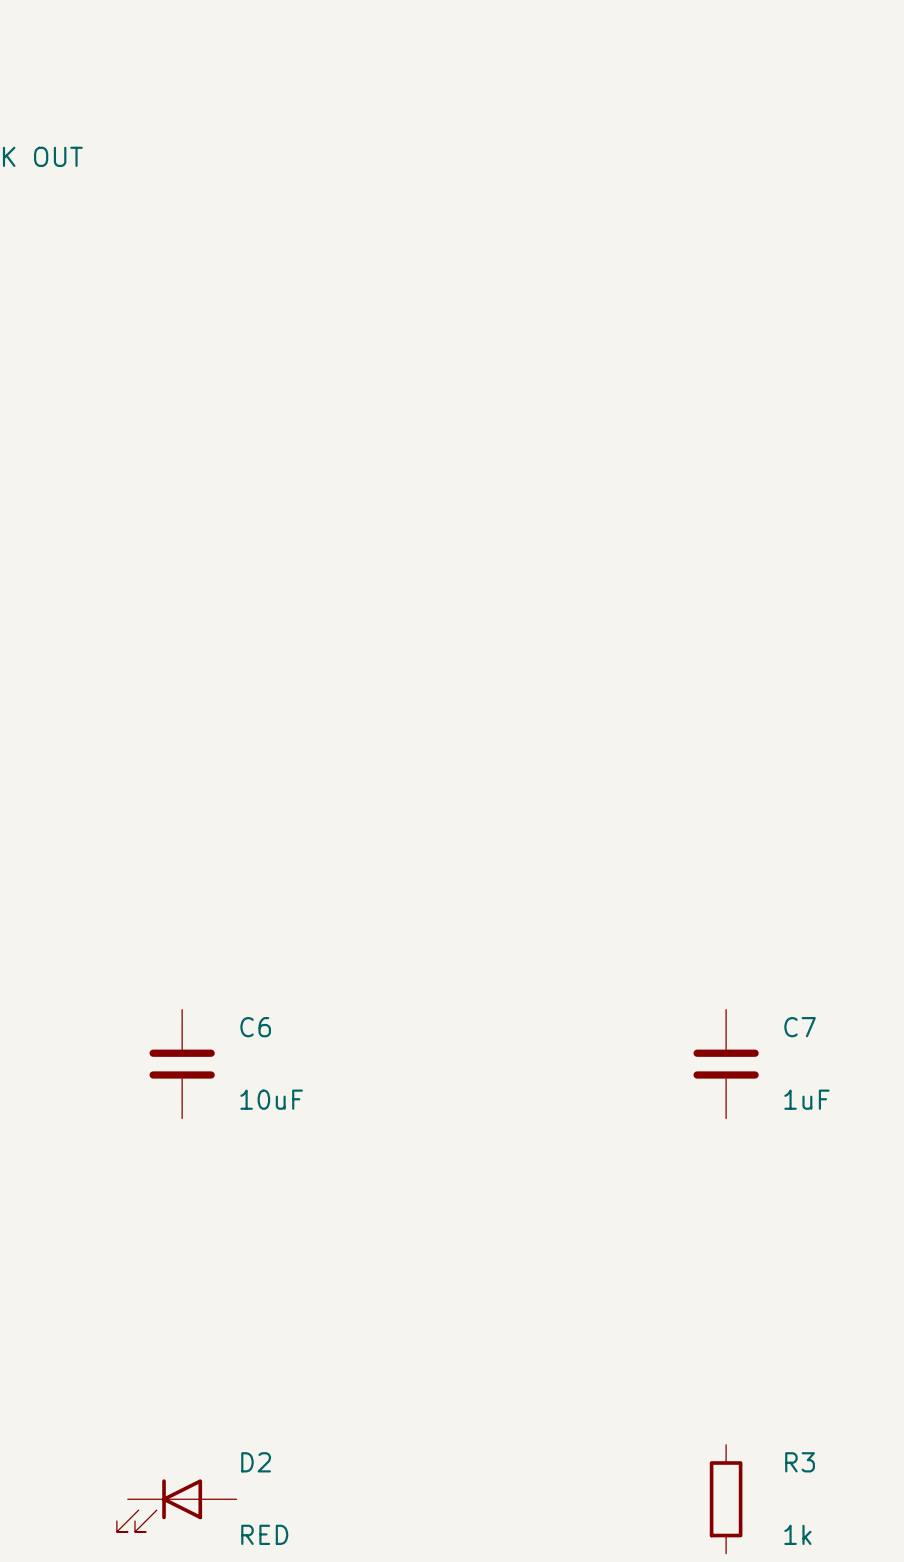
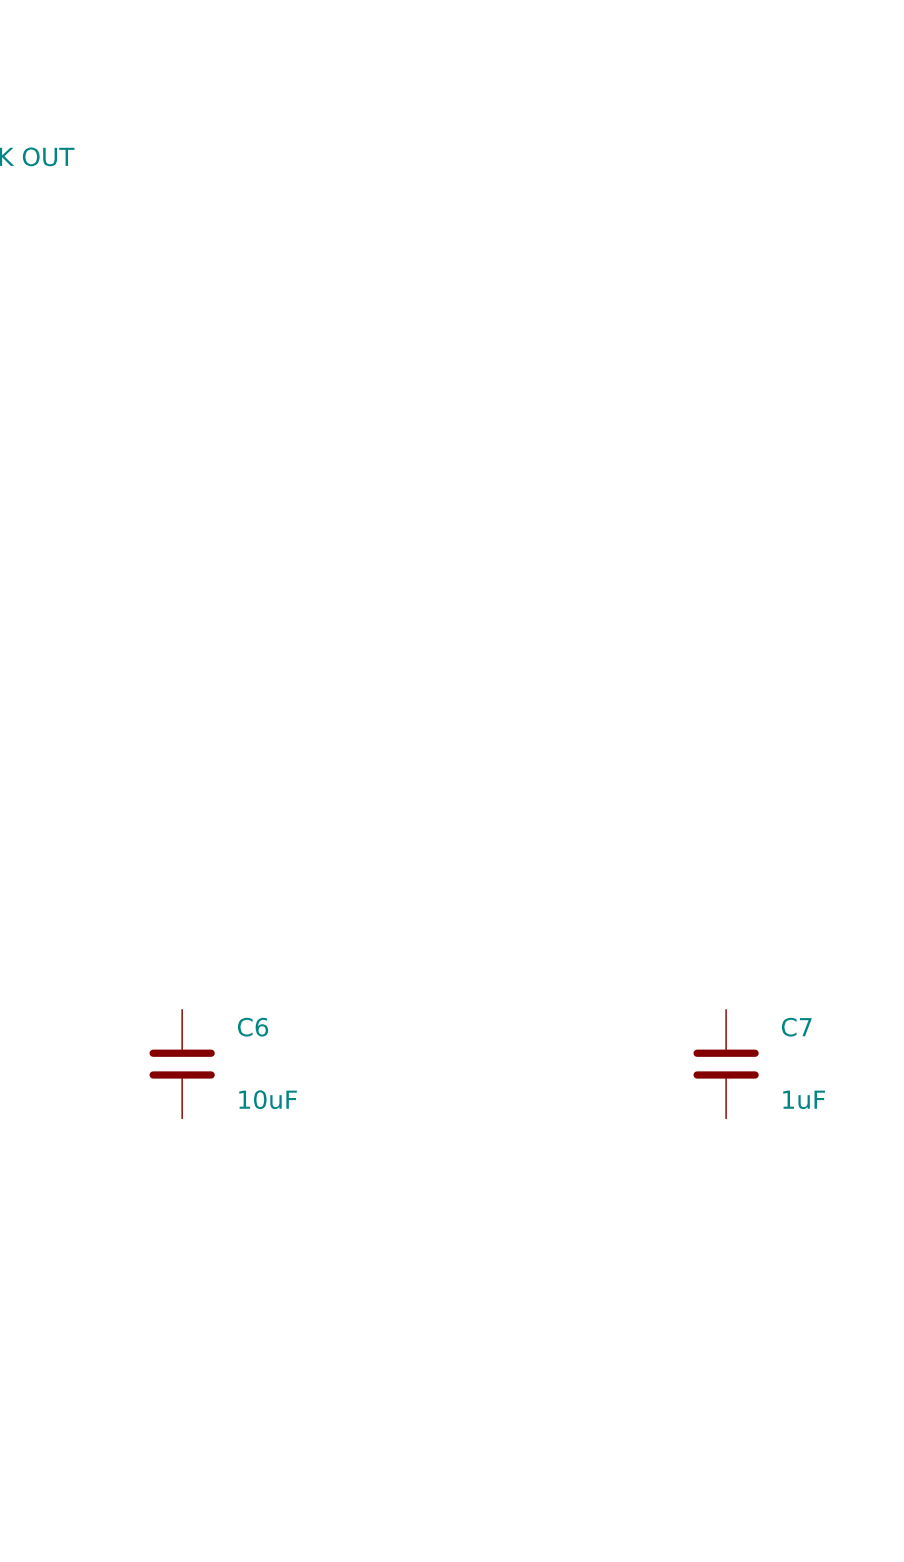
R3: 1k (726, 1499) -> none
D2: RED (176, 1505) -> none

